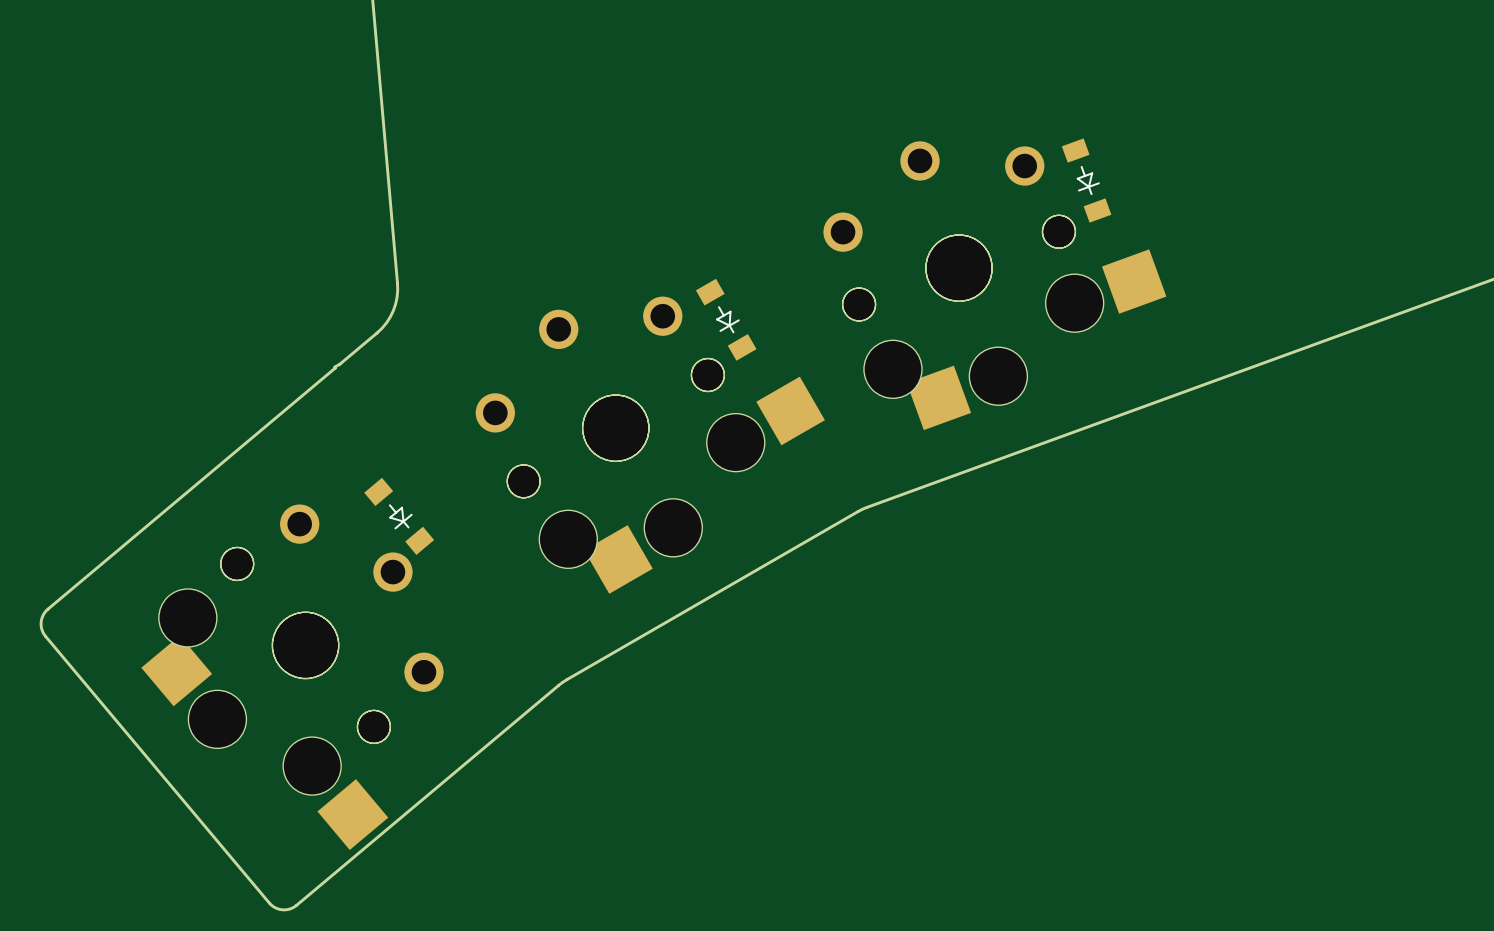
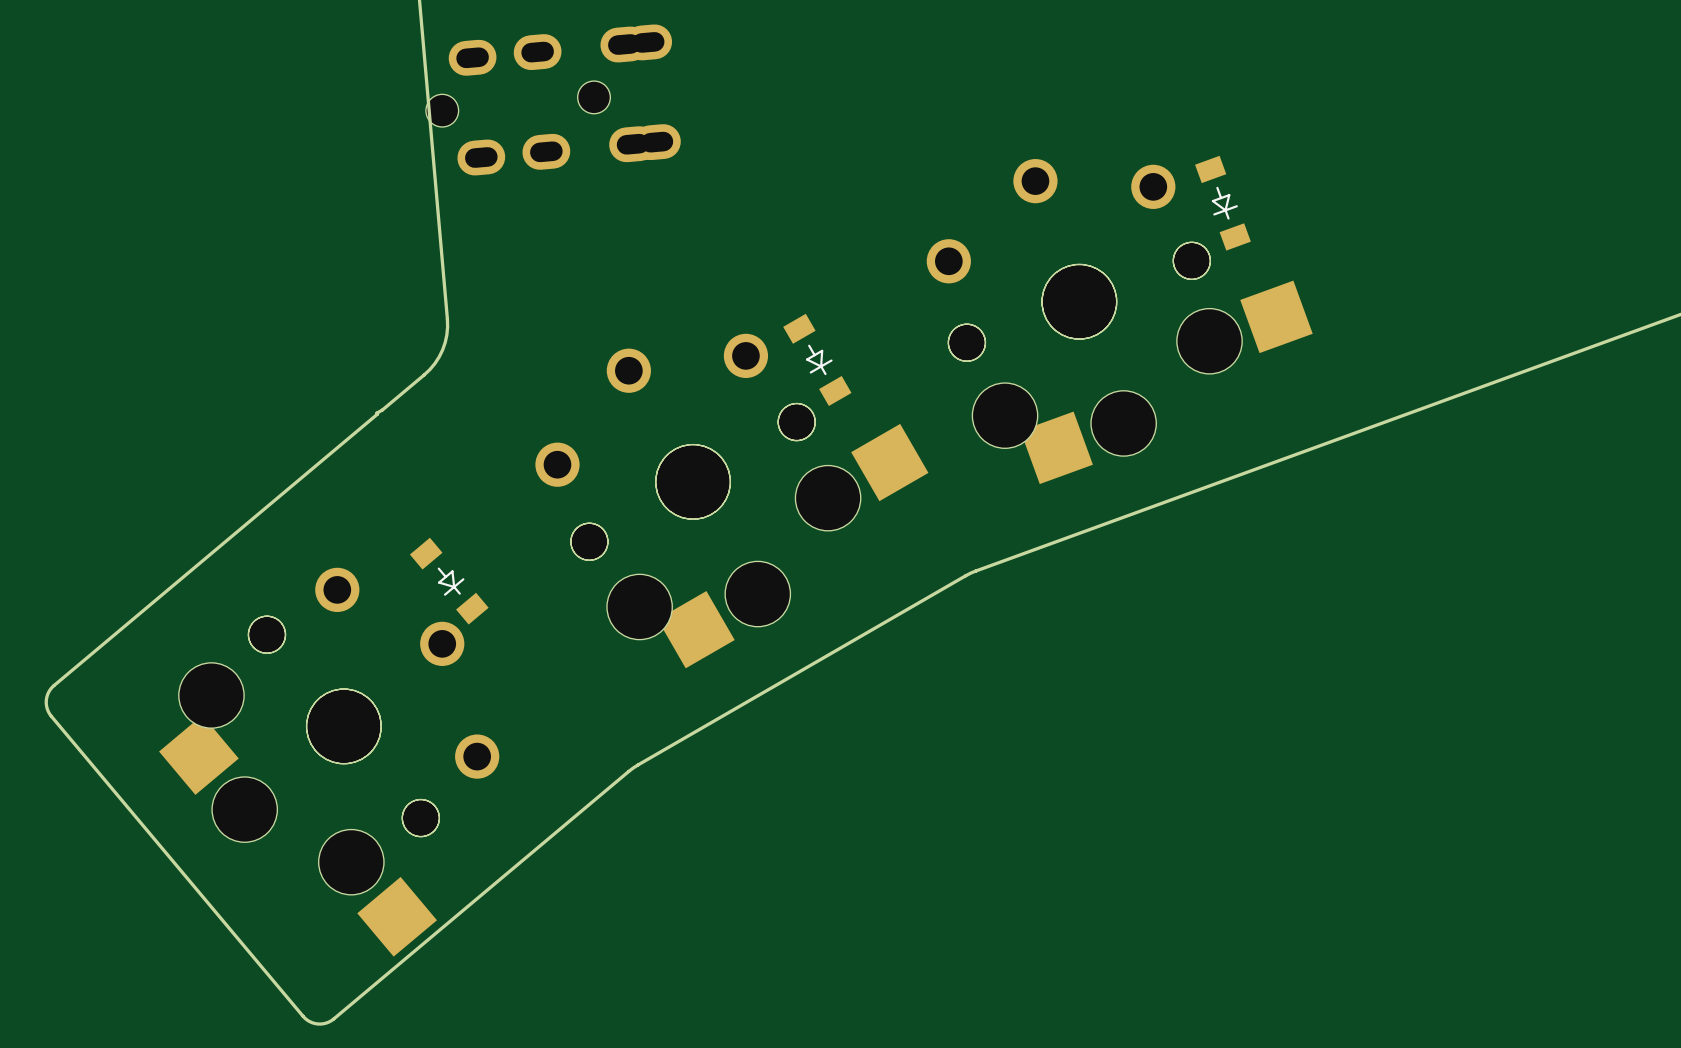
part: none -> (553, 99)

